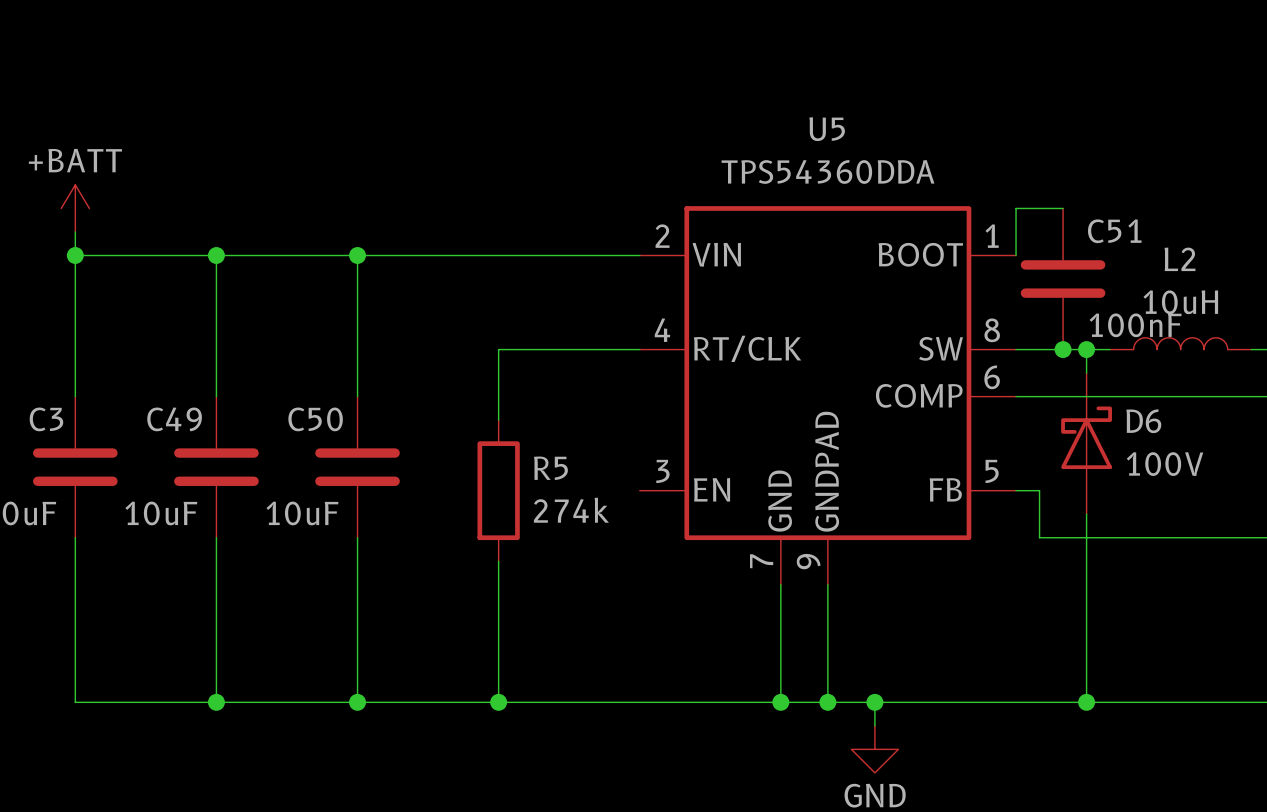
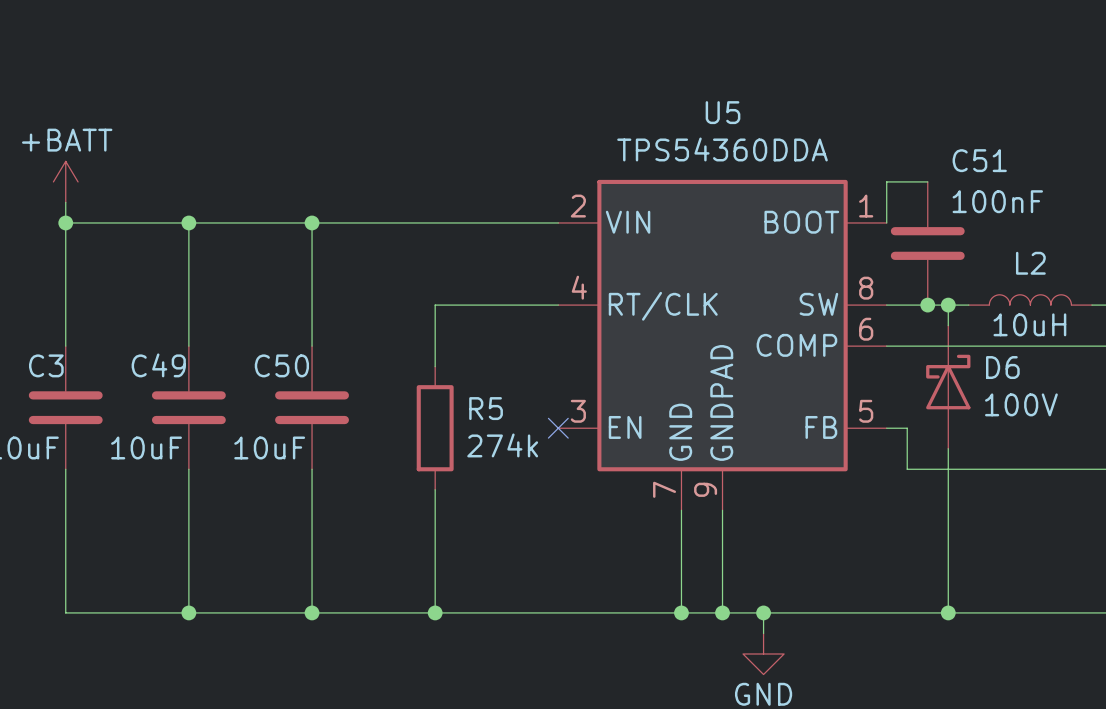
C51 name position: C51 (1114, 231) -> C51 (979, 160)
L2 name position: L2 (1179, 259) -> L2 (1030, 263)
L2 value position: 10uH (1180, 302) -> 10uH (1029, 324)
C51 value position: 100nF (1135, 325) -> 100nF (997, 201)
no-connect mark: none -> (558, 428)

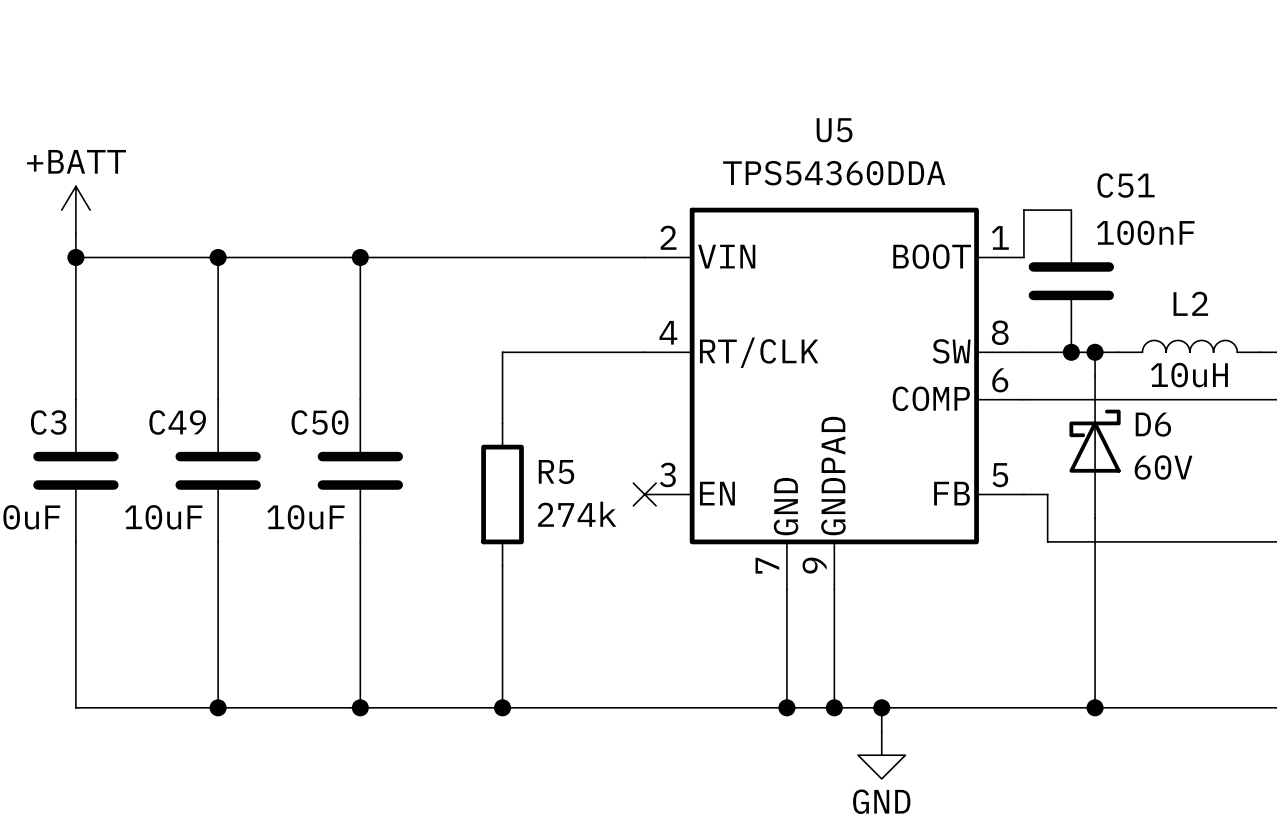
D6 value: 100V (1021, 404) -> 60V (1163, 467)

